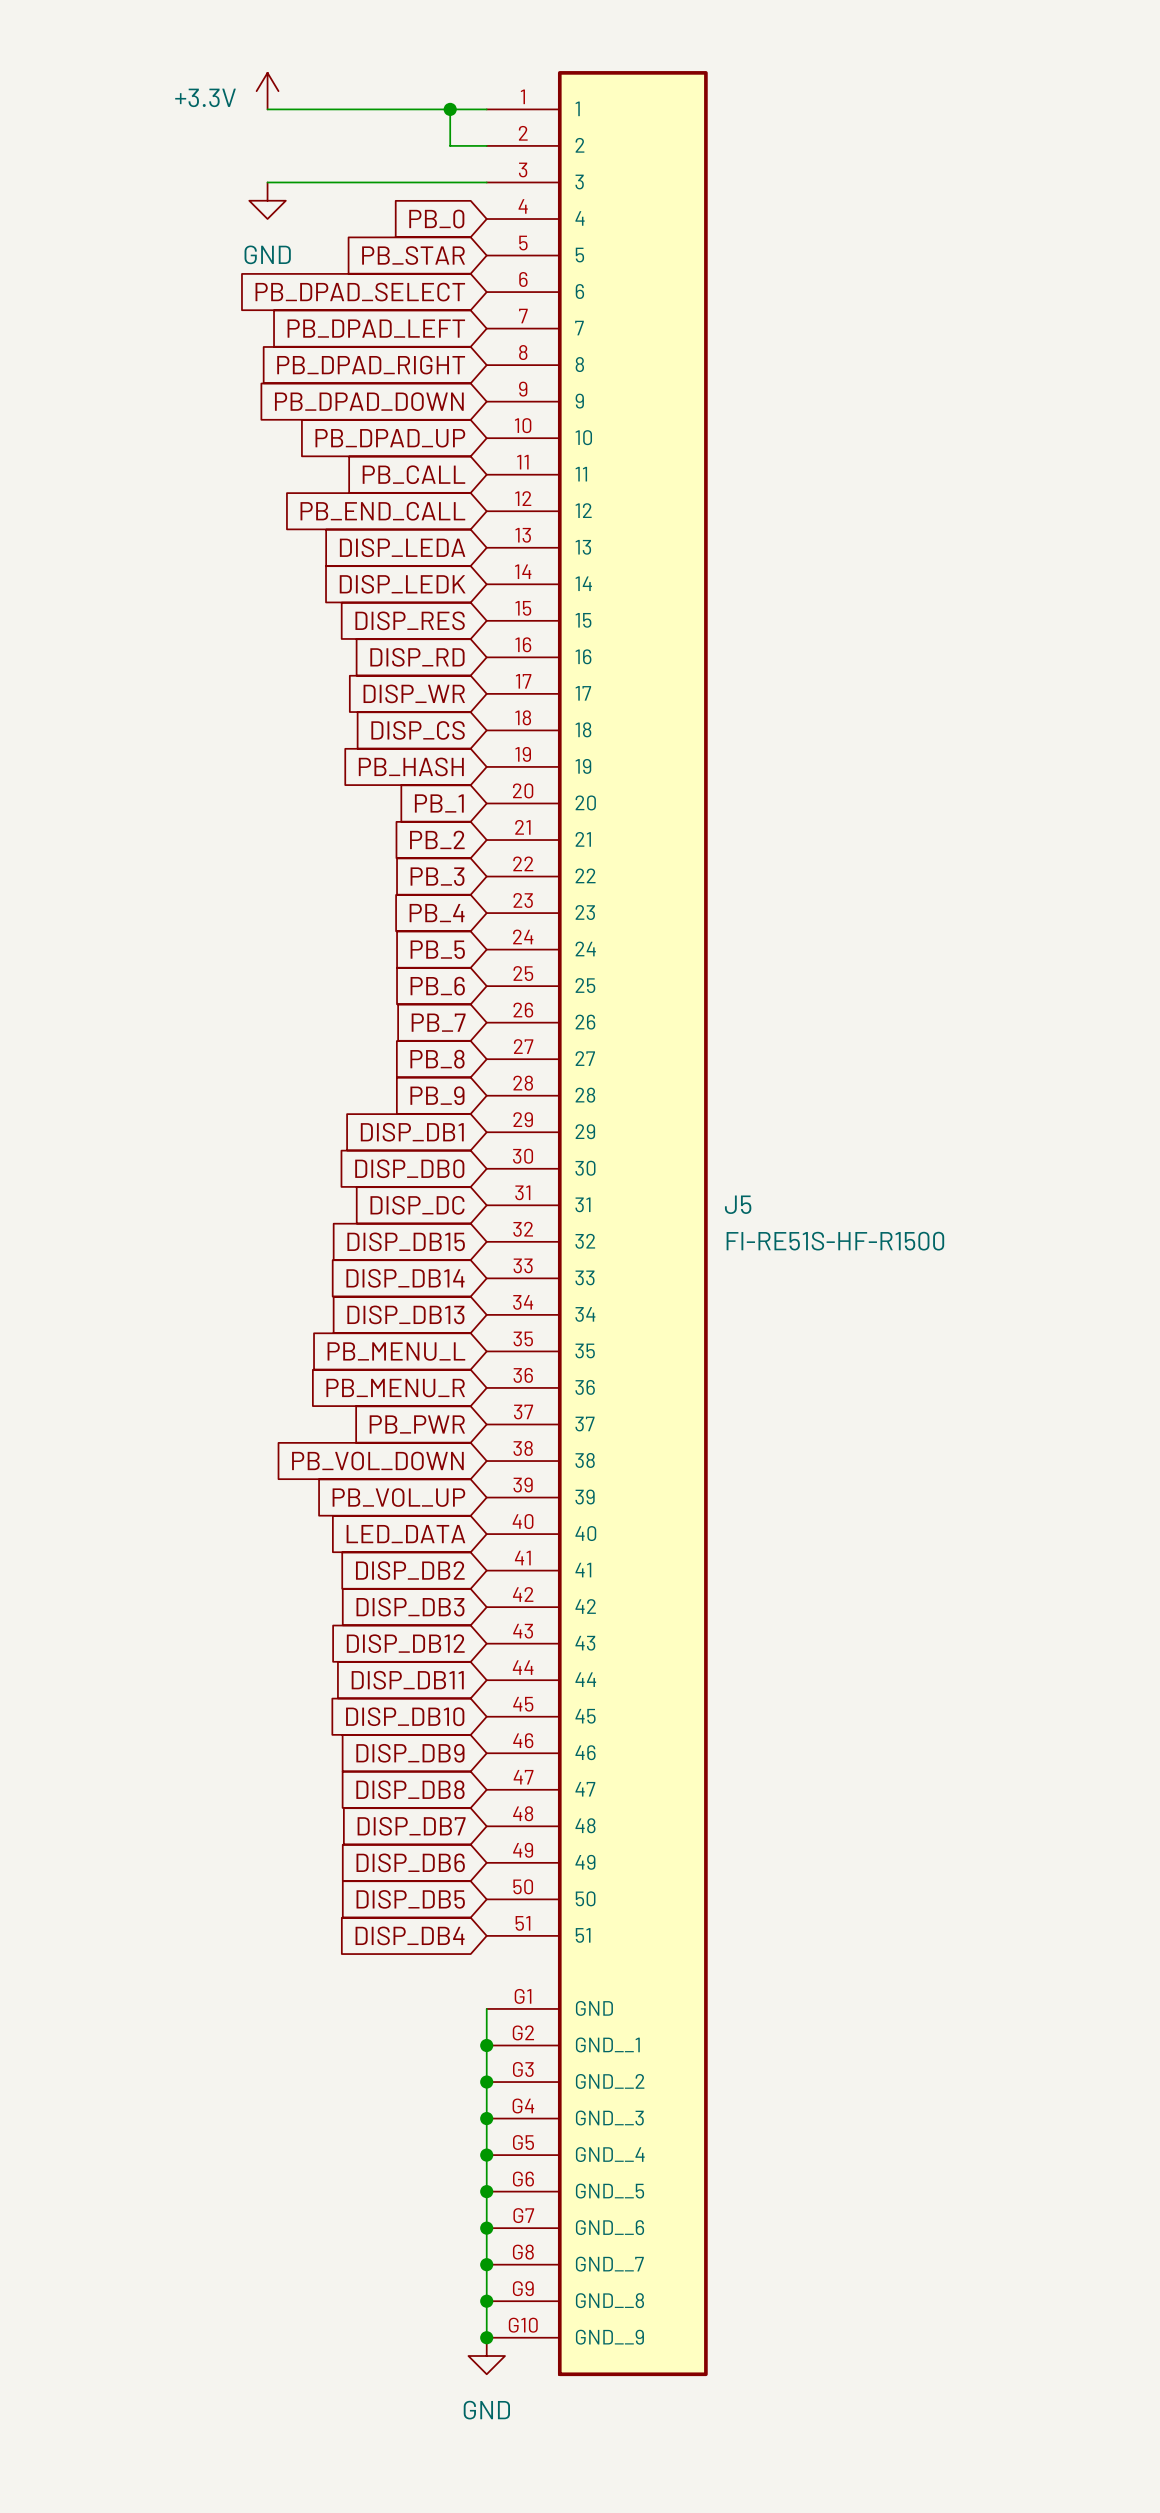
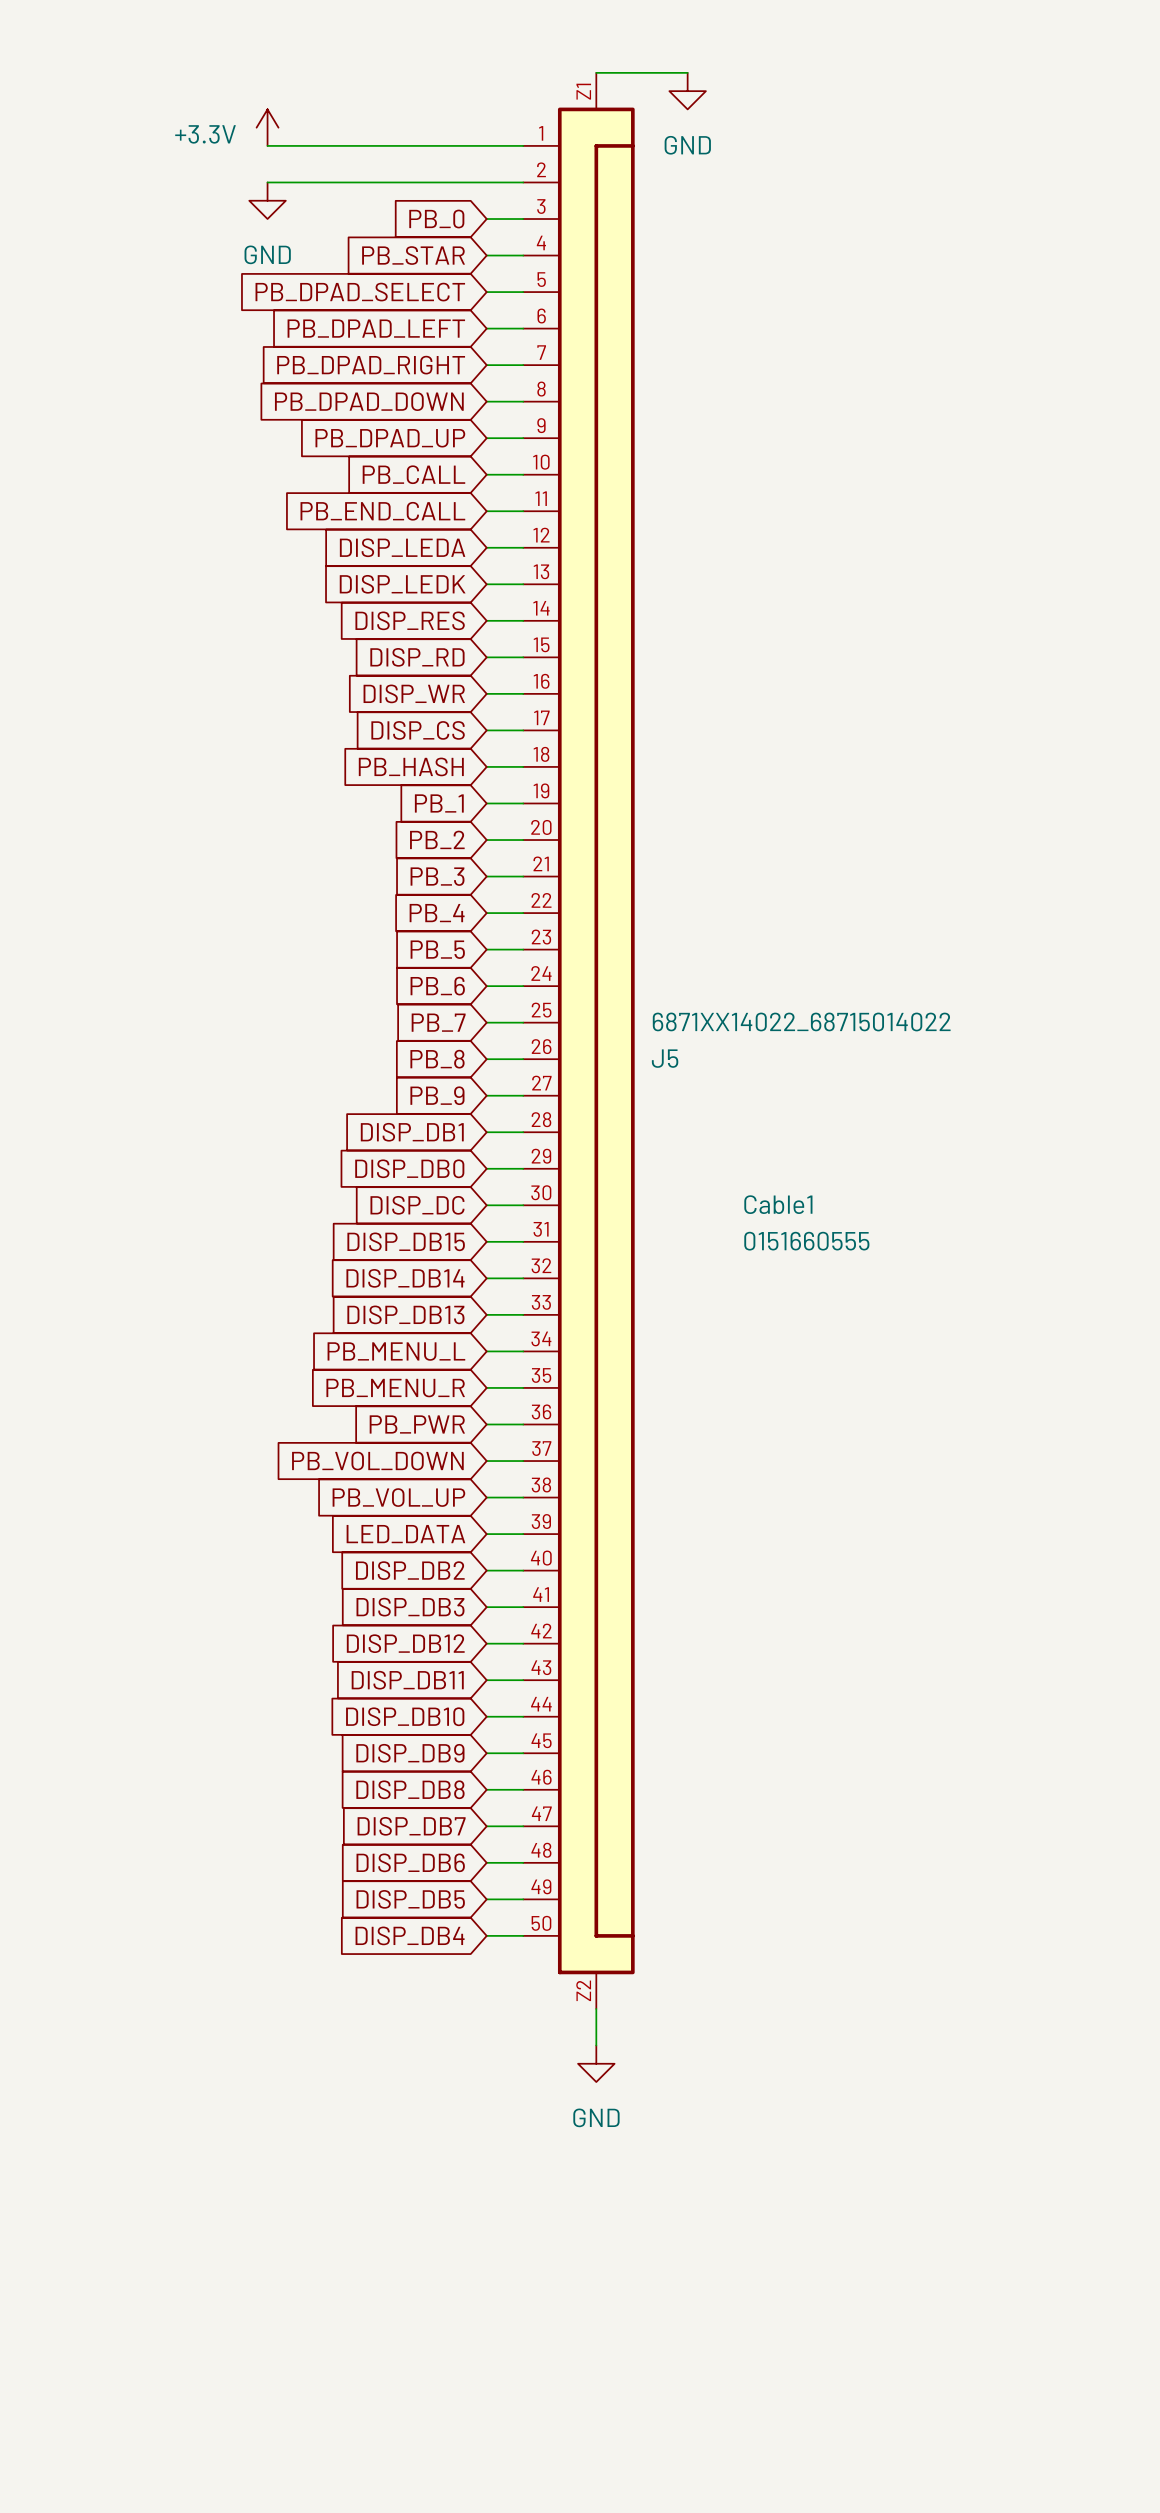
J5 symbol: [486, 71, 708, 2377] -> [523, 72, 635, 2009]
power symbol position: +3.3V (267, 91) -> +3.3V (267, 127)
power symbol: none -> GND (687, 91)
wire: (267, 109) (486, 109) -> none
wire: (450, 109) (450, 145) -> (267, 145) (450, 145)
junction: (450, 109) -> none
J5 name position: J5 (738, 1204) -> J5 (665, 1058)
Cable1: none -> 0151660555 (806, 1222)
J5 value: FI-RE51S-HF-R1500 (835, 1241) -> 6871XX14022_68715014022 (801, 1021)
wire: (486, 2008) (486, 2337) -> none
junction: (486, 2045) -> none
junction: (486, 2082) -> none
junction: (486, 2118) -> none
junction: (486, 2155) -> none
junction: (486, 2191) -> none
junction: (486, 2228) -> none
junction: (486, 2264) -> none
junction: (486, 2301) -> none
junction: (486, 2337) -> none
power symbol position: GND (486, 2356) -> GND (596, 2063)

